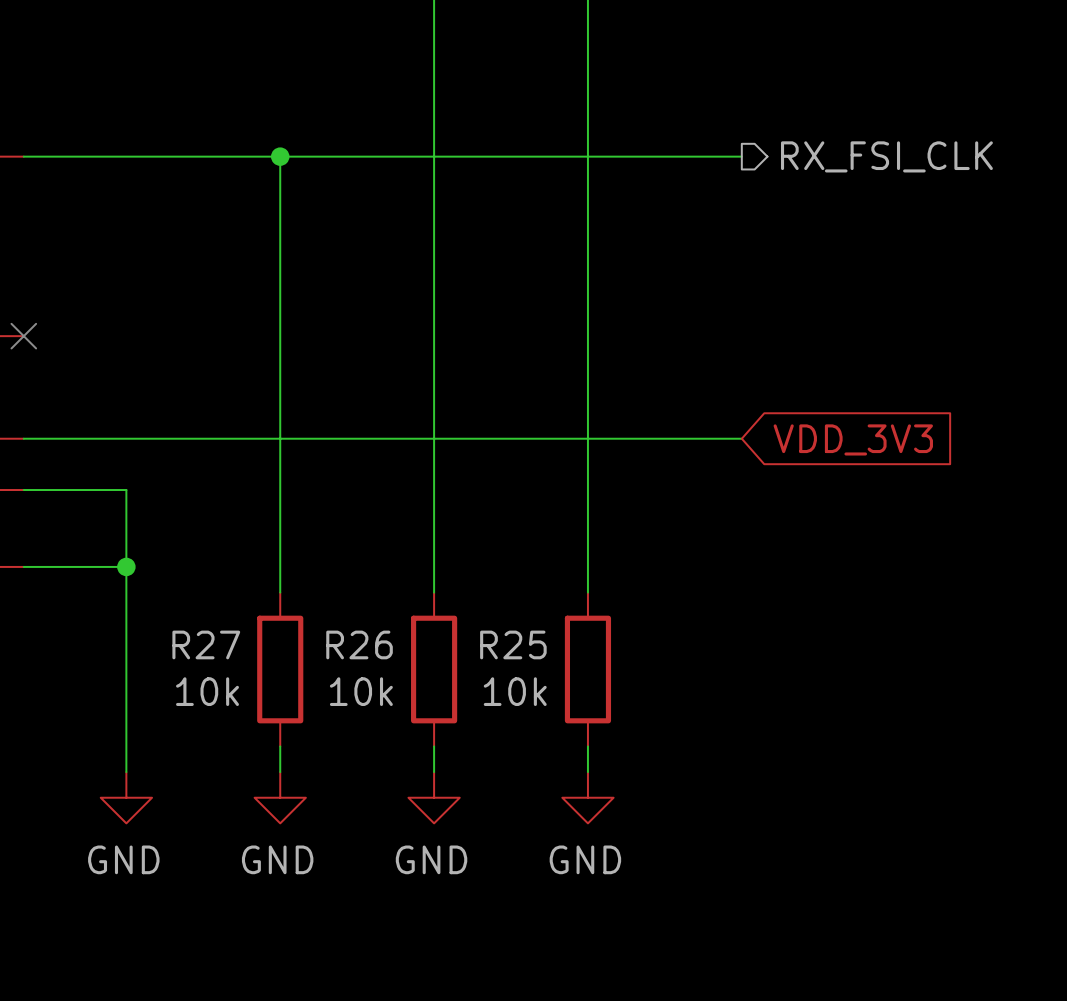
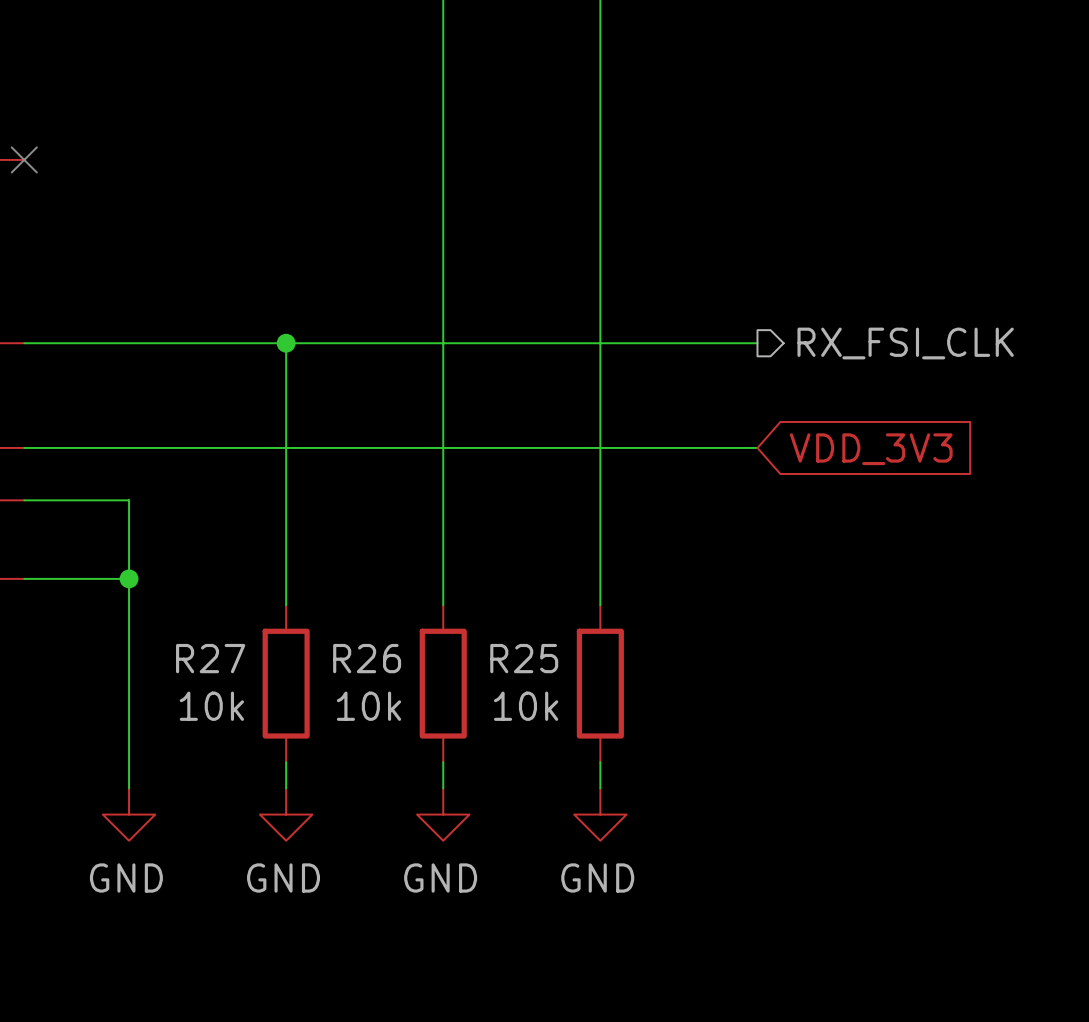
wire: (23, 156) (741, 156) -> (24, 343) (757, 343)
no-connect mark: none -> (24, 159)
wire: (280, 156) (280, 336) -> none
junction: (280, 156) -> none
hierarchical label position: RX_FSI_CLK (886, 156) -> RX_FSI_CLK (905, 343)
no-connect mark: (23, 336) -> none
junction: none -> (286, 343)

